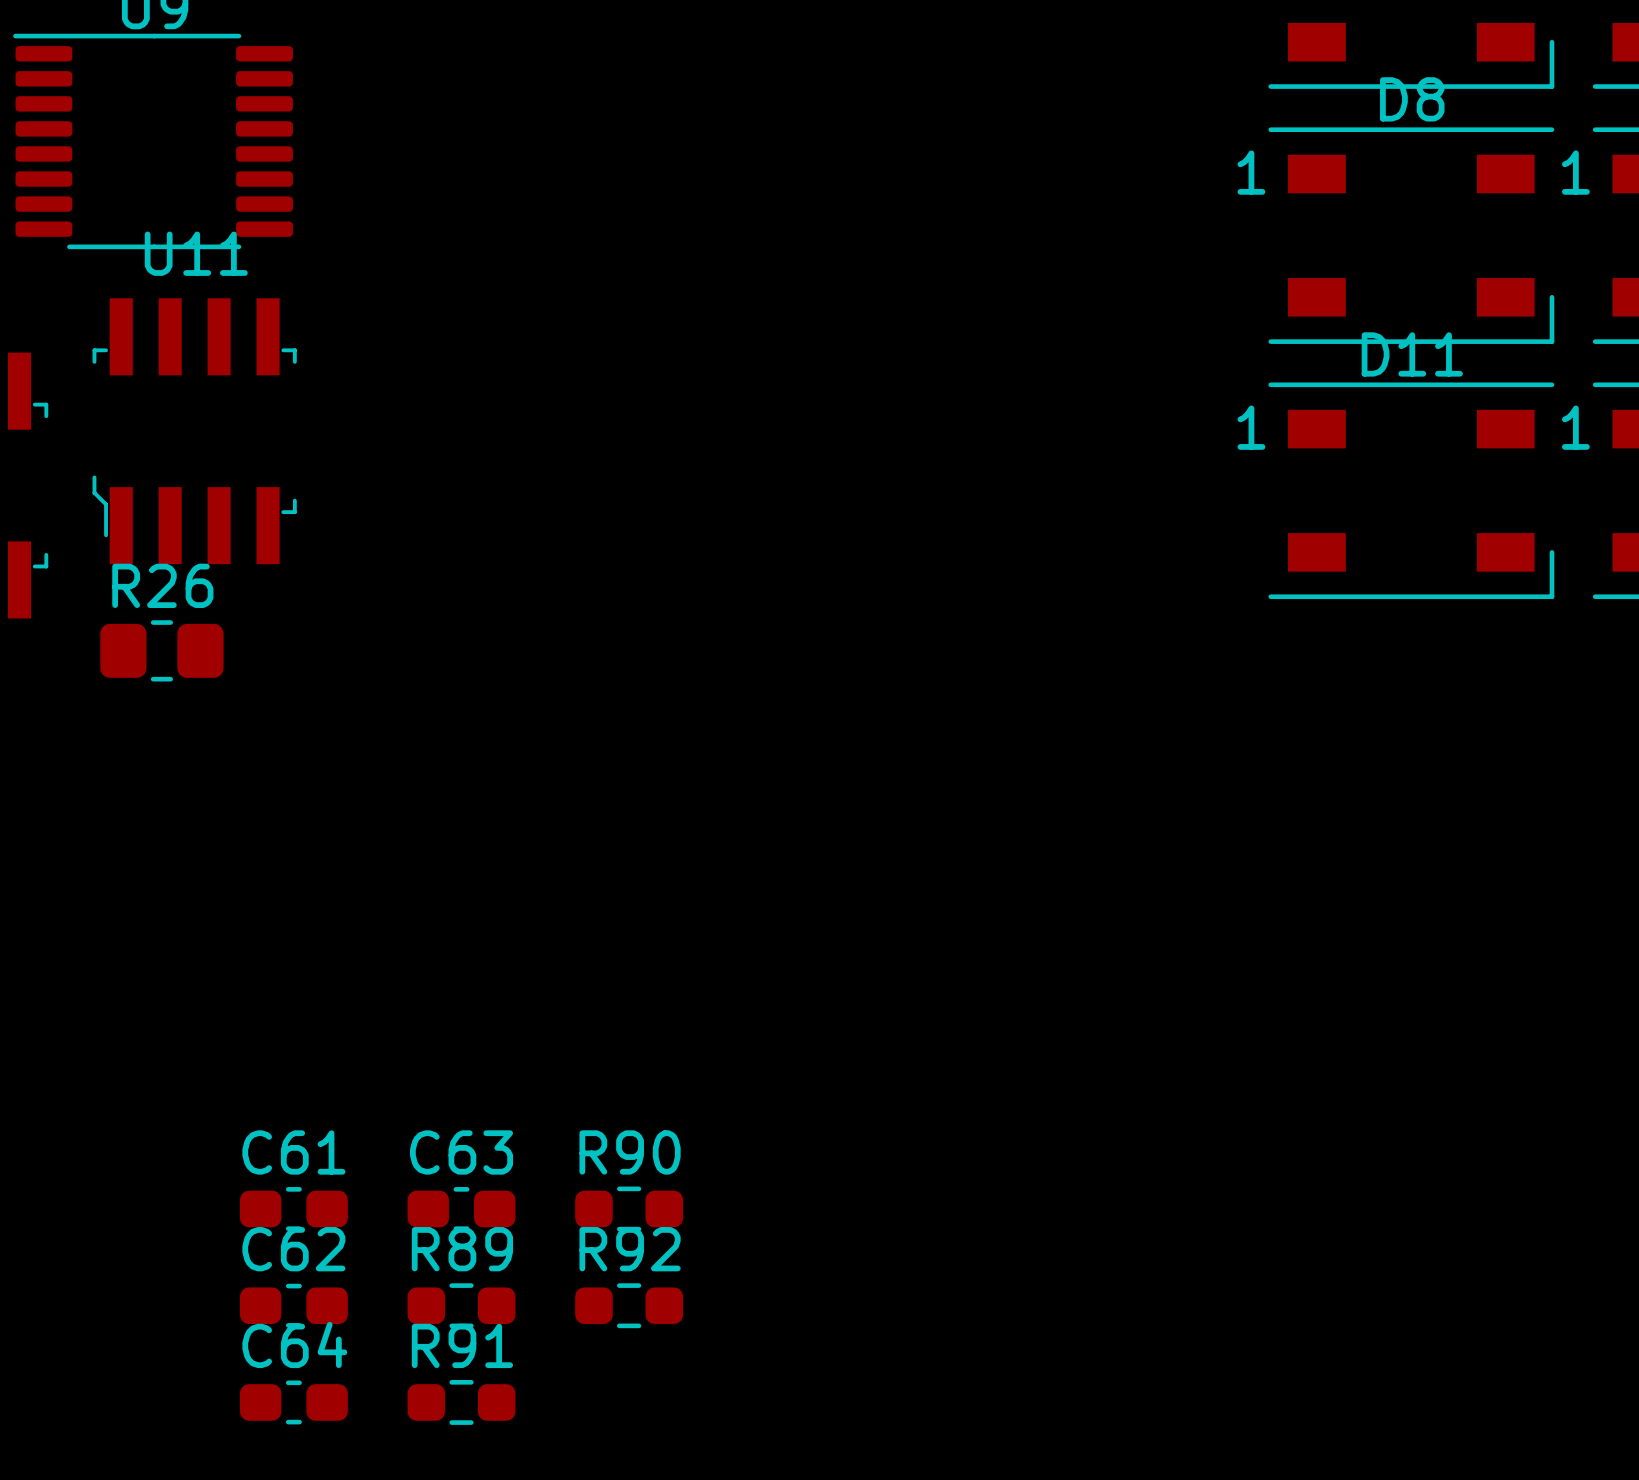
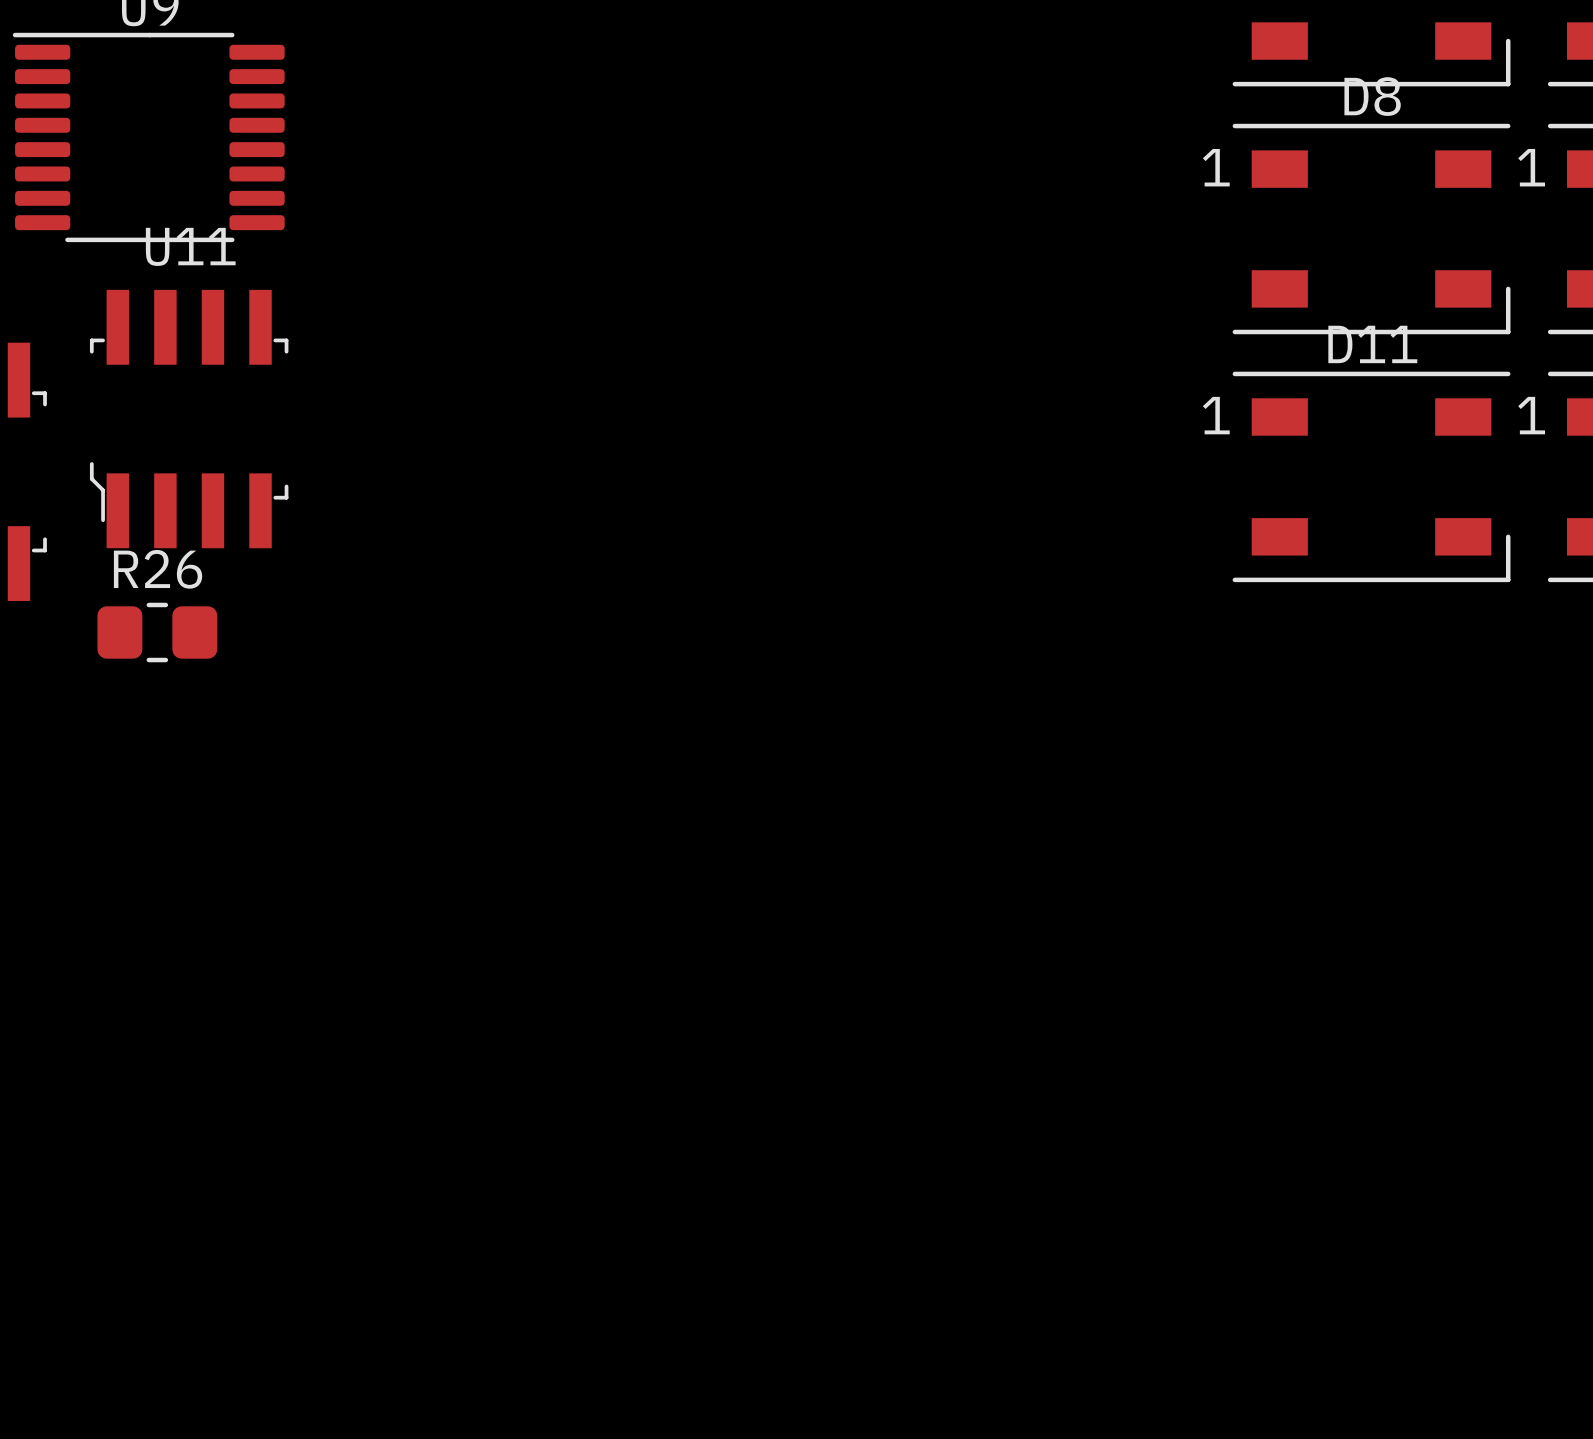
C61: (293, 1209) -> none
C63: (461, 1209) -> none
R90: (629, 1209) -> none
C62: (293, 1305) -> none
R89: (461, 1305) -> none
R92: (629, 1305) -> none
C64: (293, 1402) -> none
R91: (461, 1402) -> none

